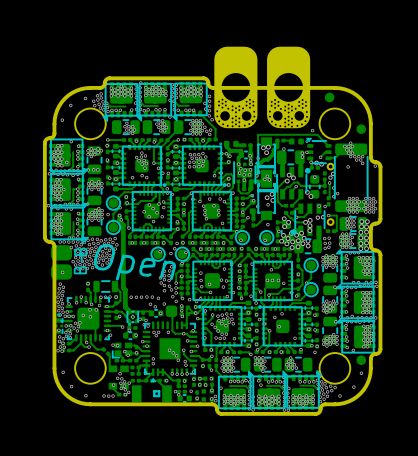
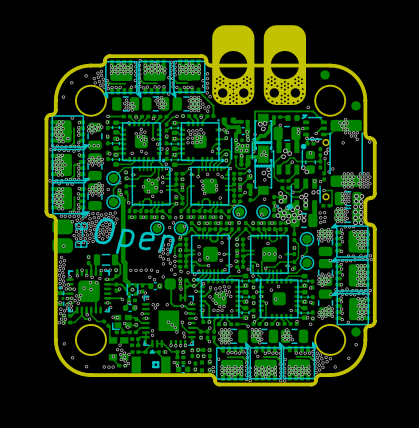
part footprint: [181, 144, 227, 187] -> [179, 121, 225, 163]
part footprint: [131, 190, 173, 232] -> [130, 165, 172, 207]
part footprint: [191, 190, 233, 232] -> [189, 165, 231, 207]
part footprint: [191, 260, 234, 302] -> [190, 233, 231, 275]
part footprint: [252, 260, 294, 302] -> [249, 234, 290, 275]
part footprint: [142, 321, 198, 383] -> [142, 294, 196, 354]

